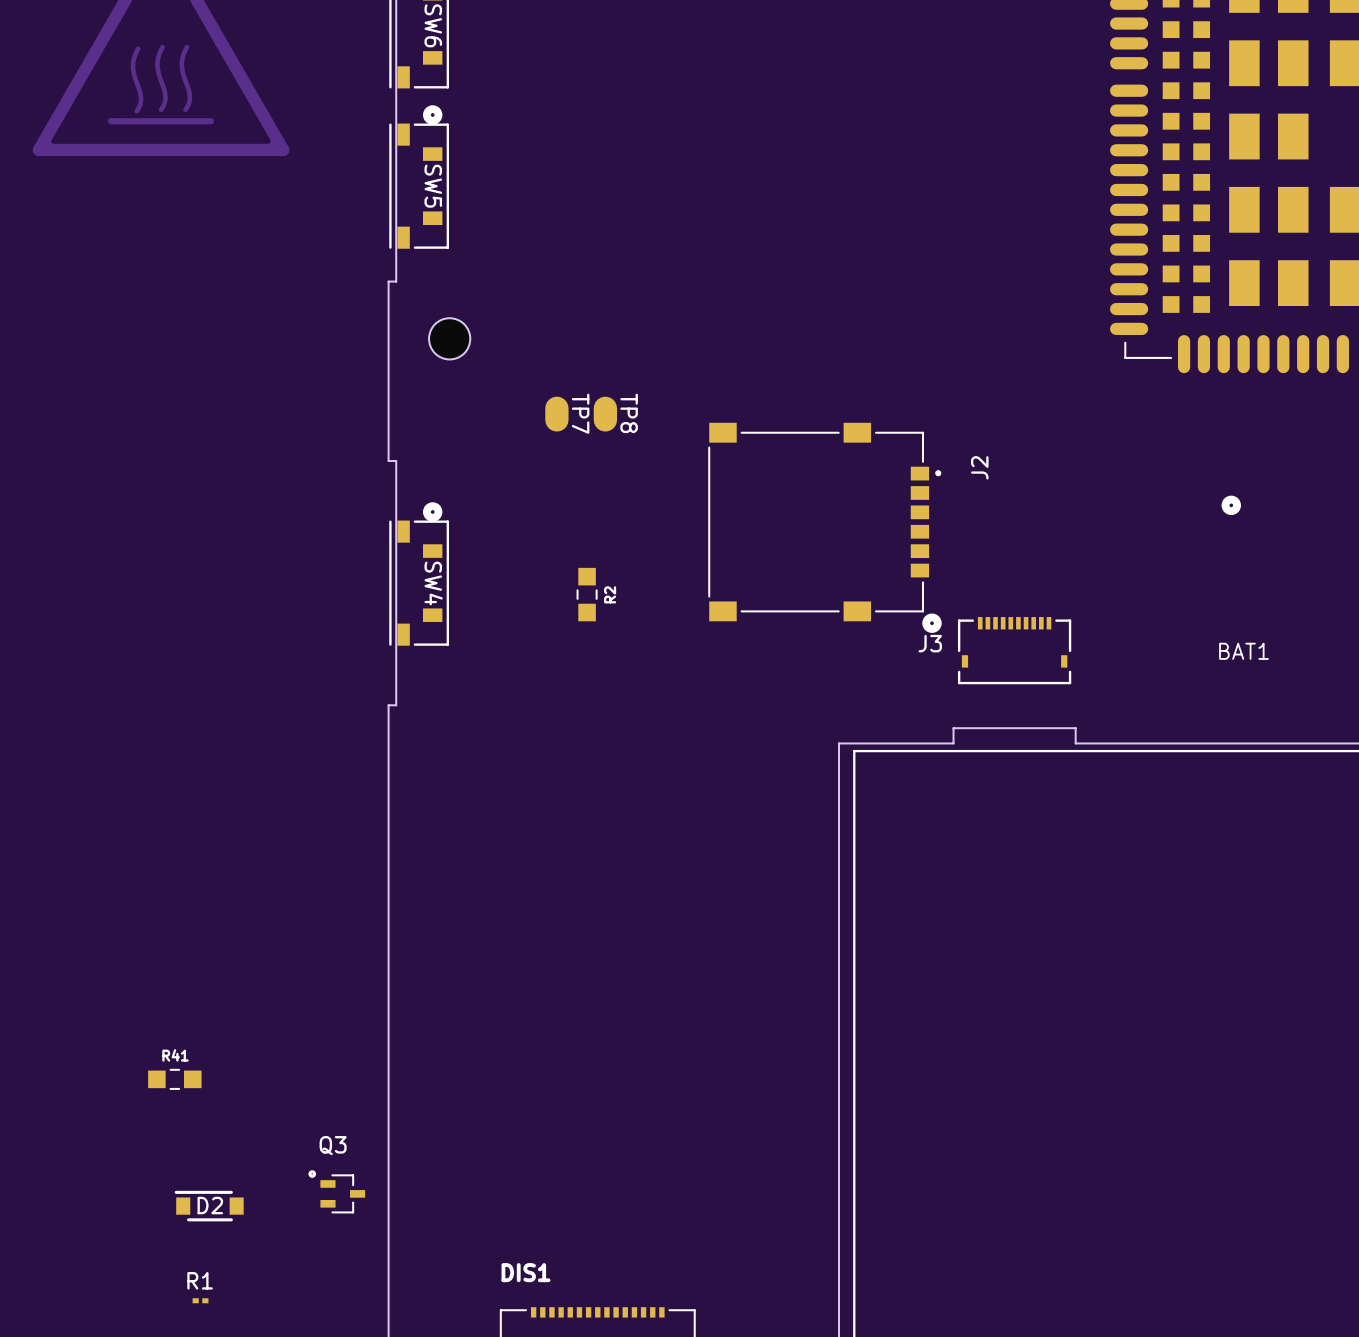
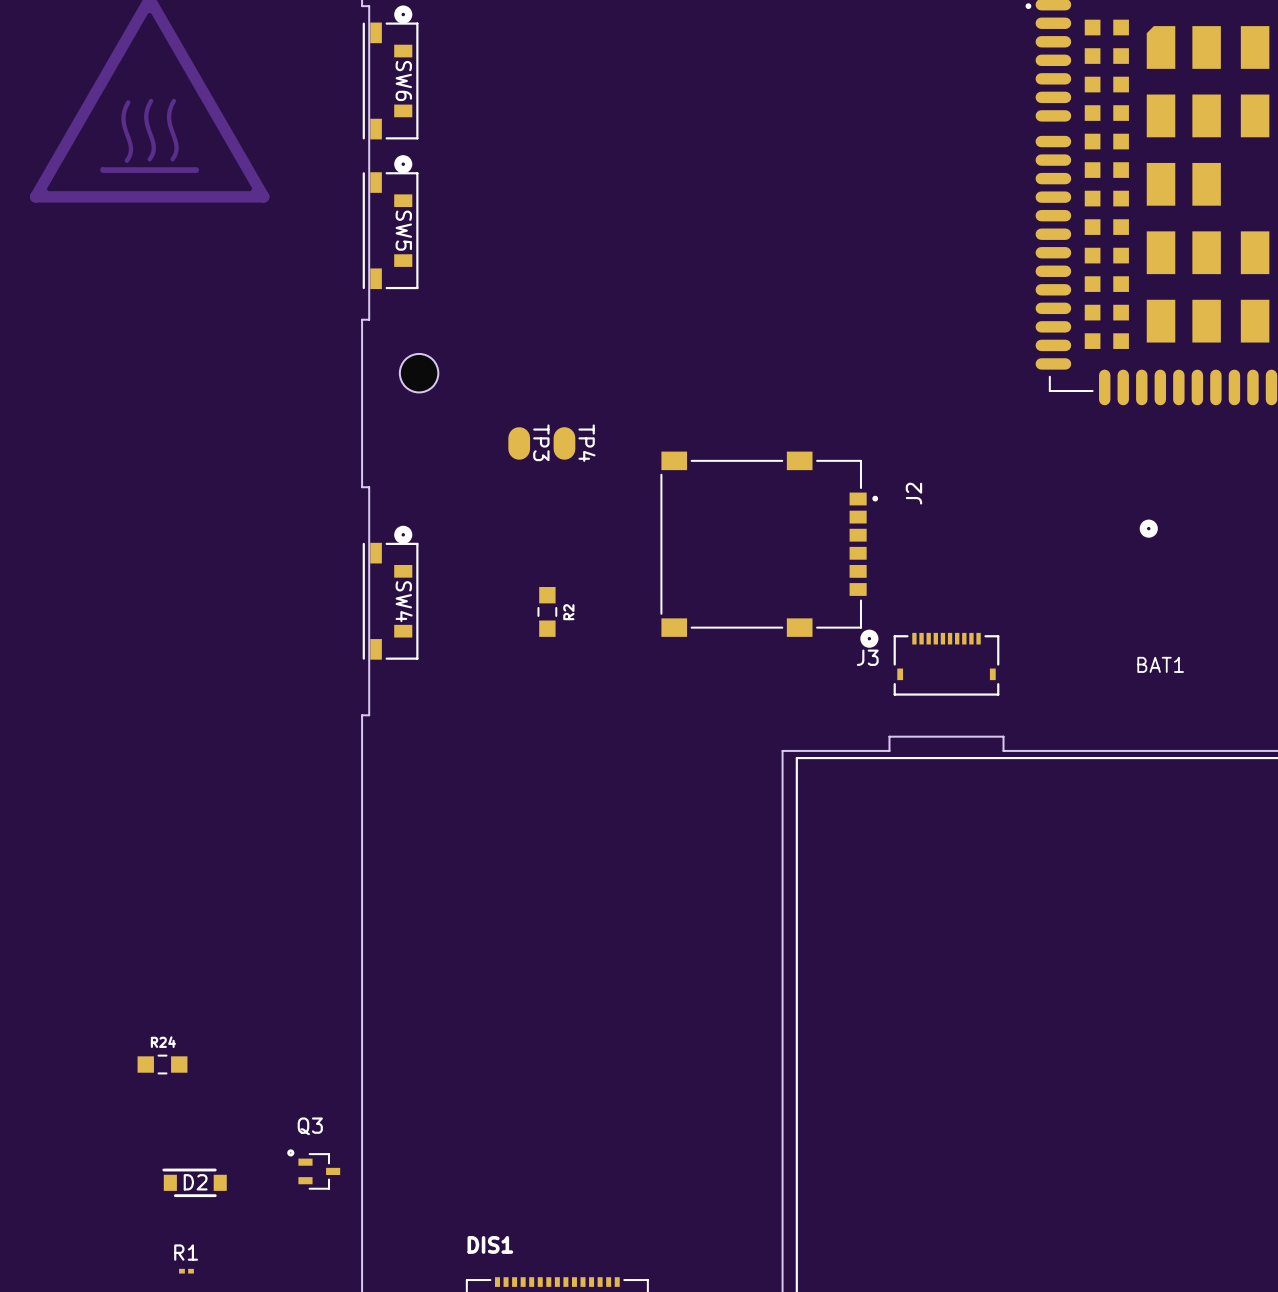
TP7 name: TP7 (580, 413) -> TP3 (541, 442)
TP8 name: TP8 (629, 413) -> TP4 (586, 443)
R41 name: R41 (175, 1055) -> R24 (163, 1042)

